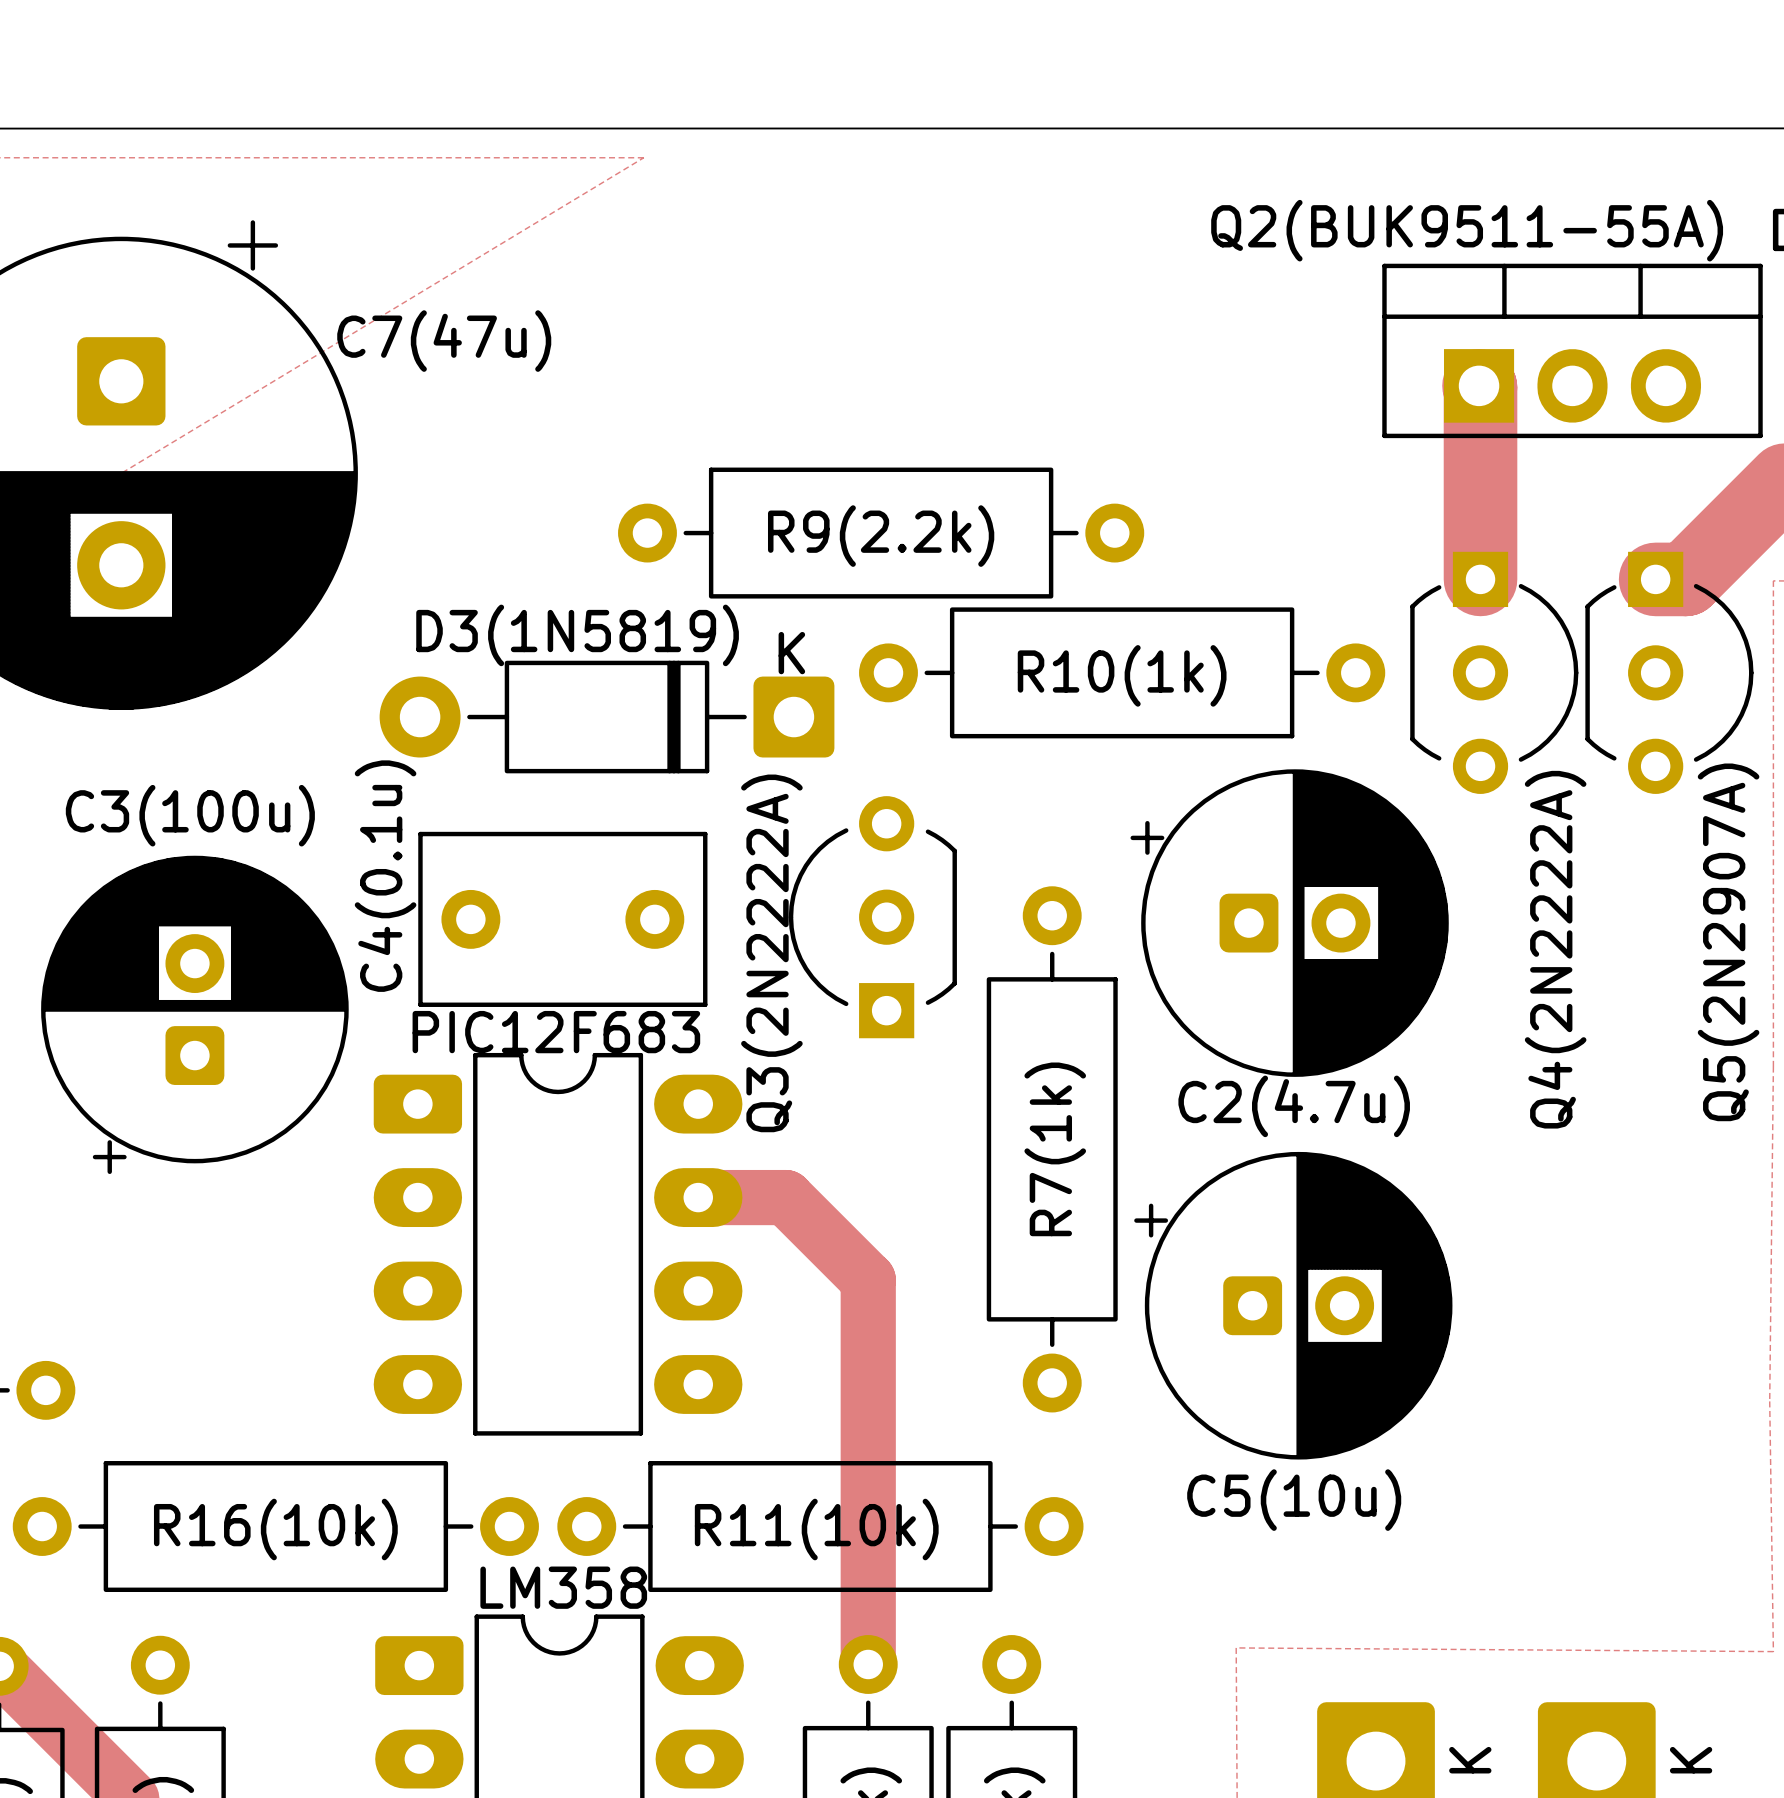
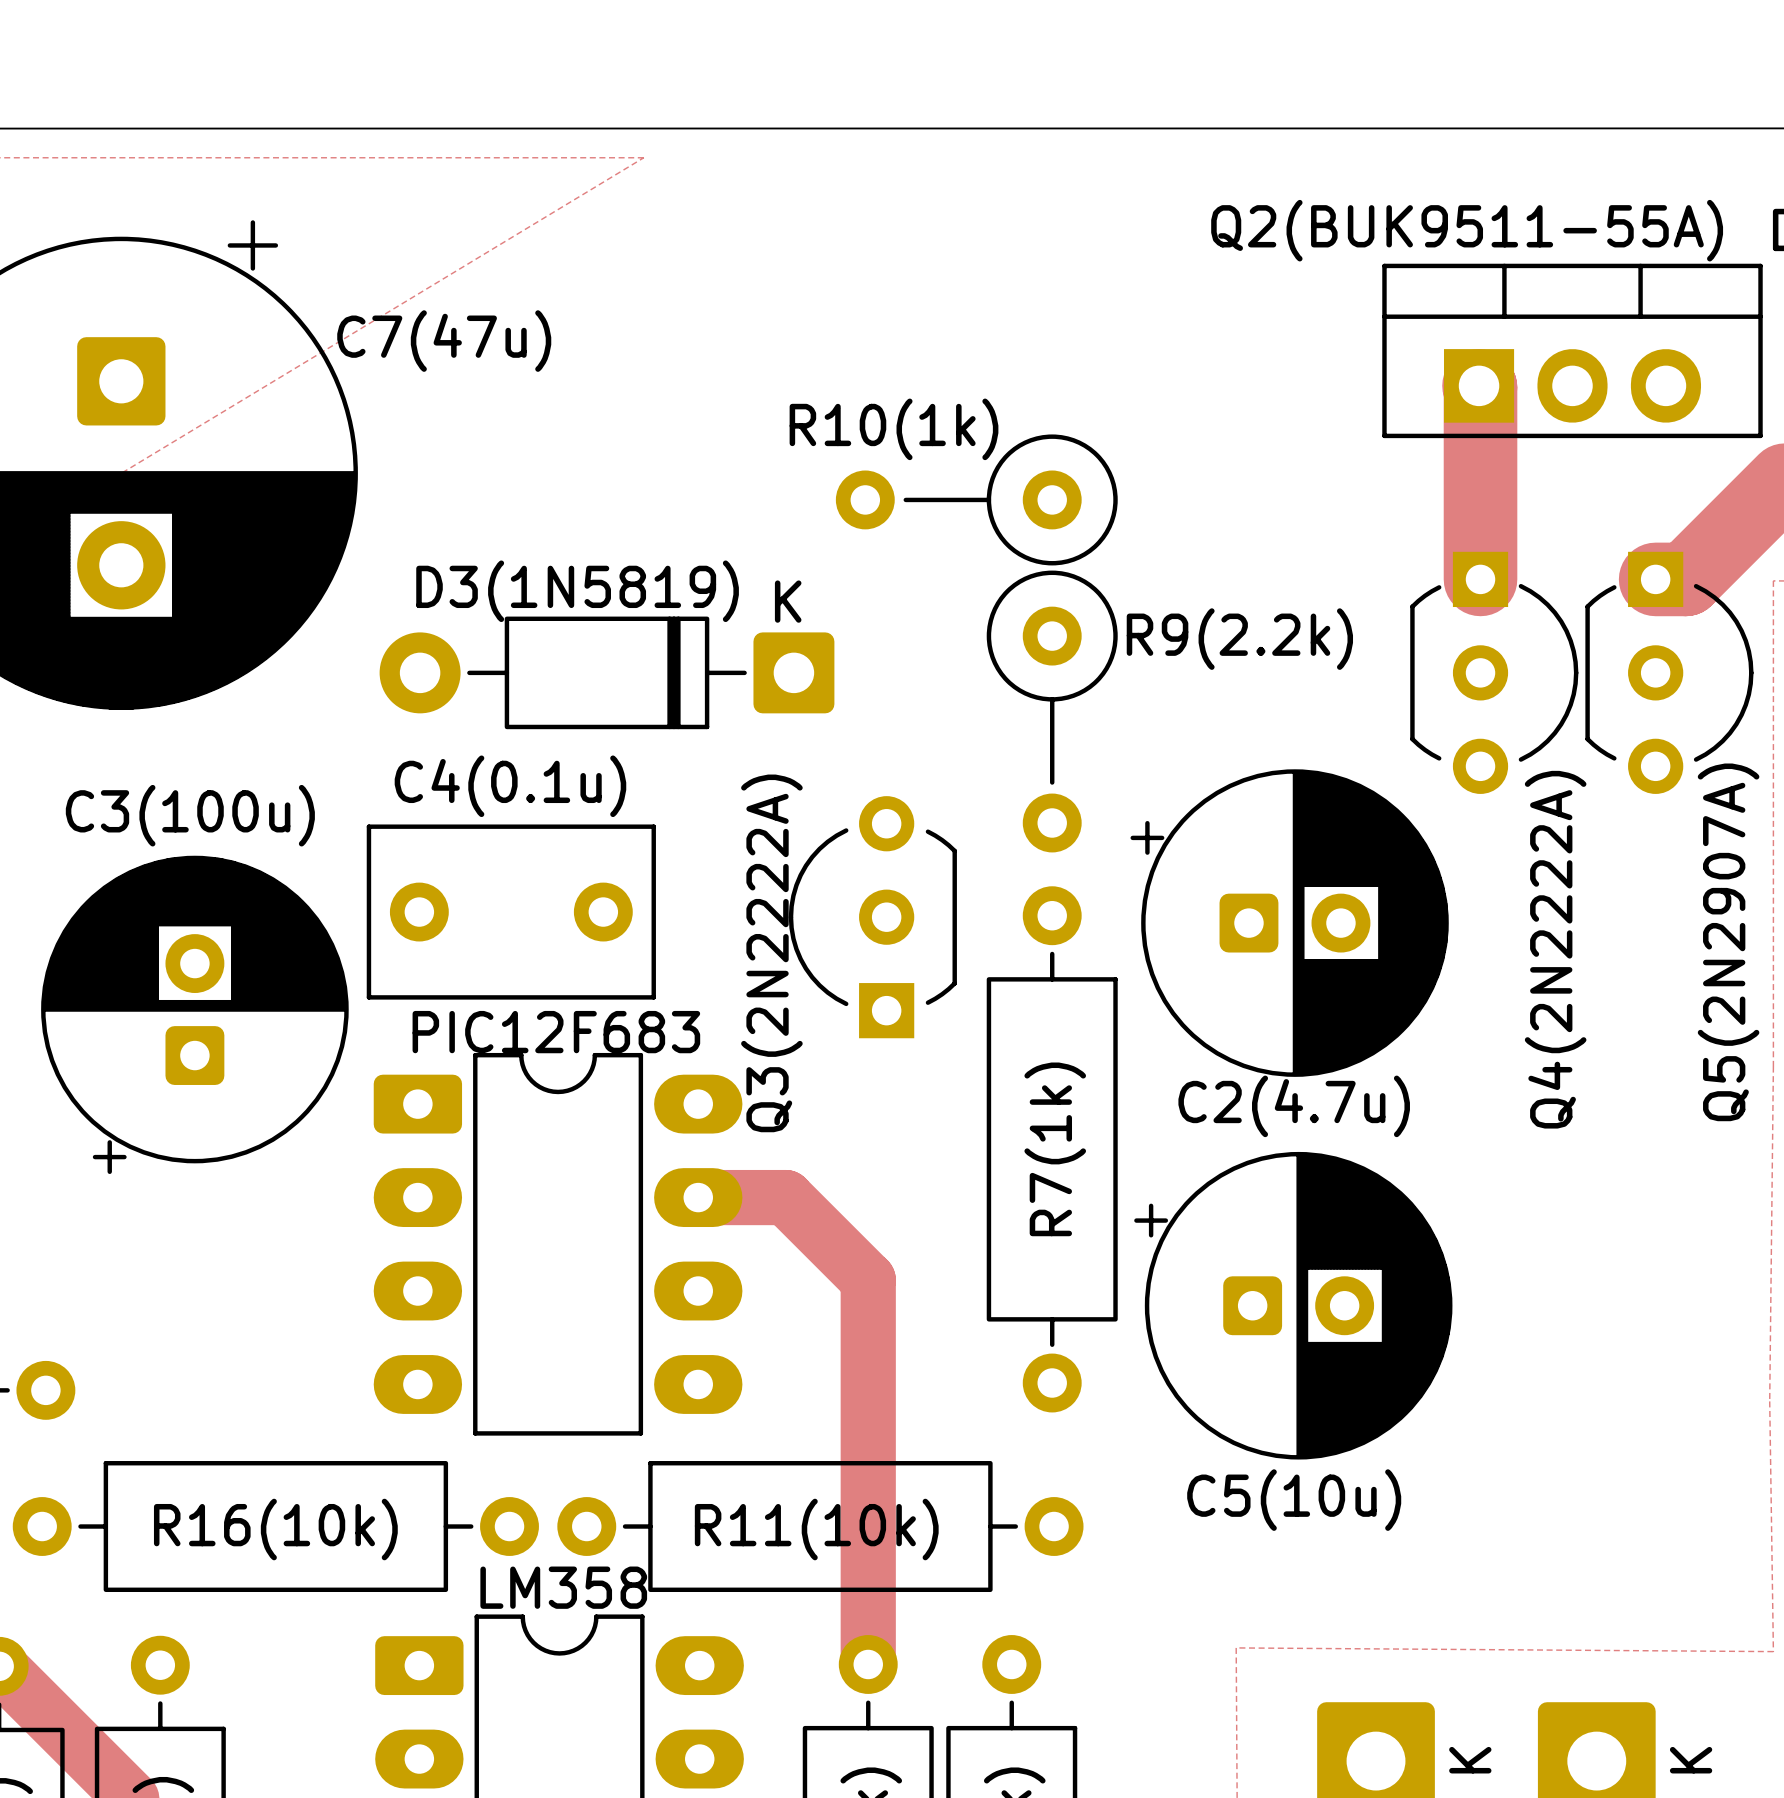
R9(2.2k) footprint: [618, 467, 1145, 599] -> [986, 570, 1118, 853]
R9(2.2k) name position: R9(2.2k) (881, 536) -> R9(2.2k) (1239, 639)
R10(1k) footprint: [859, 607, 1386, 739] -> [835, 434, 1118, 566]
text position: K (791, 653) -> K (788, 601)
R10(1k) name position: R10(1k) (1122, 675) -> R10(1k) (894, 429)
D3(1N5819) position: (607, 717) -> (607, 672)
C4(0.1u) name rotation: 0° (385, 876) -> 90° clockwise (510, 786)
C4(0.1u) position: (562, 919) -> (511, 912)

